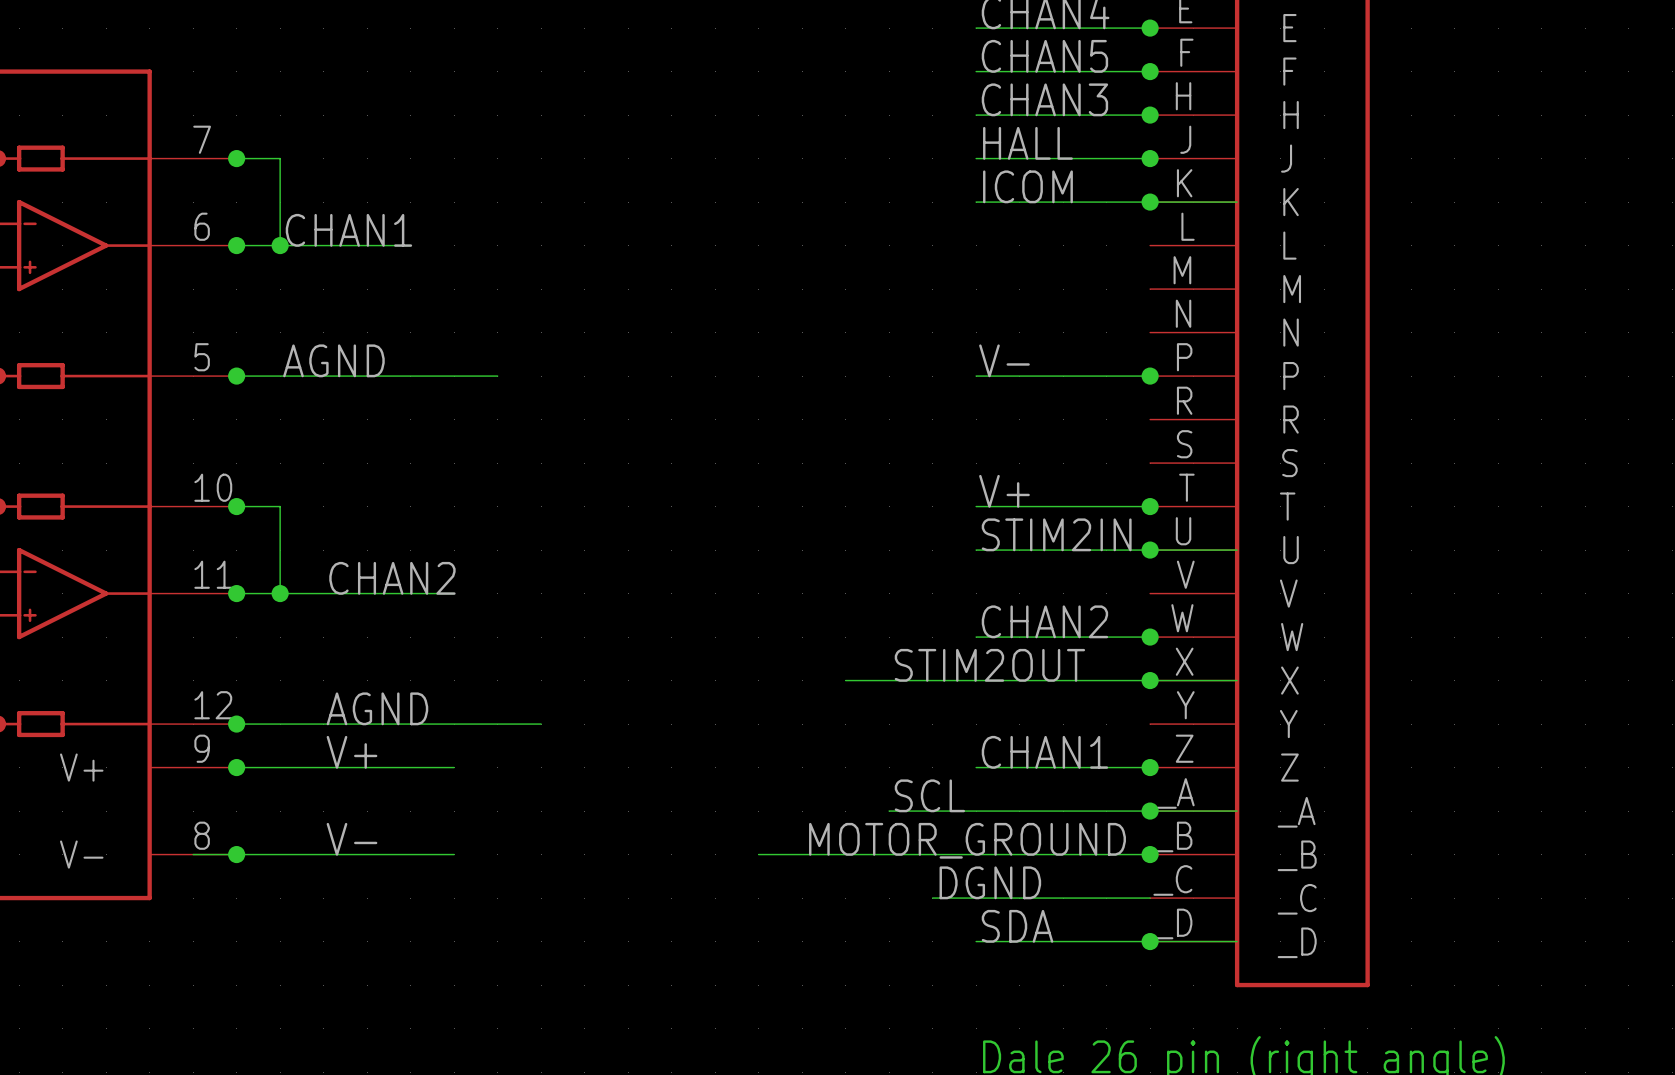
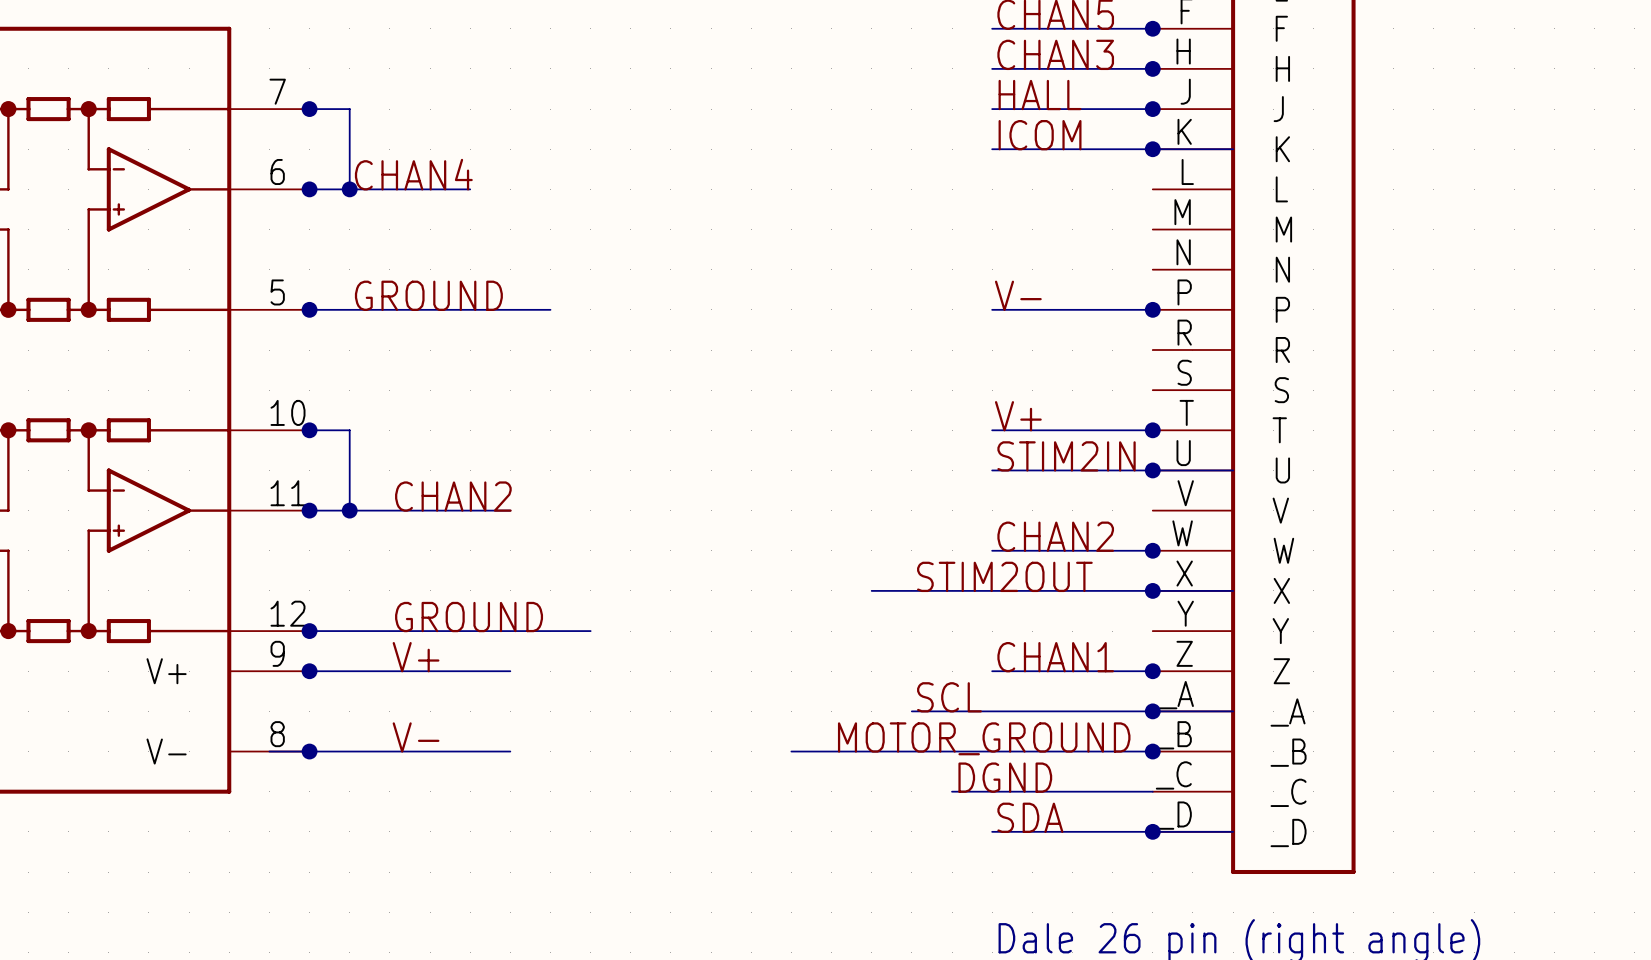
label: CHAN1 (348, 230) -> CHAN4 (413, 174)
label: AGND (333, 360) -> GROUND (428, 295)
label: AGND (377, 708) -> GROUND (469, 617)

